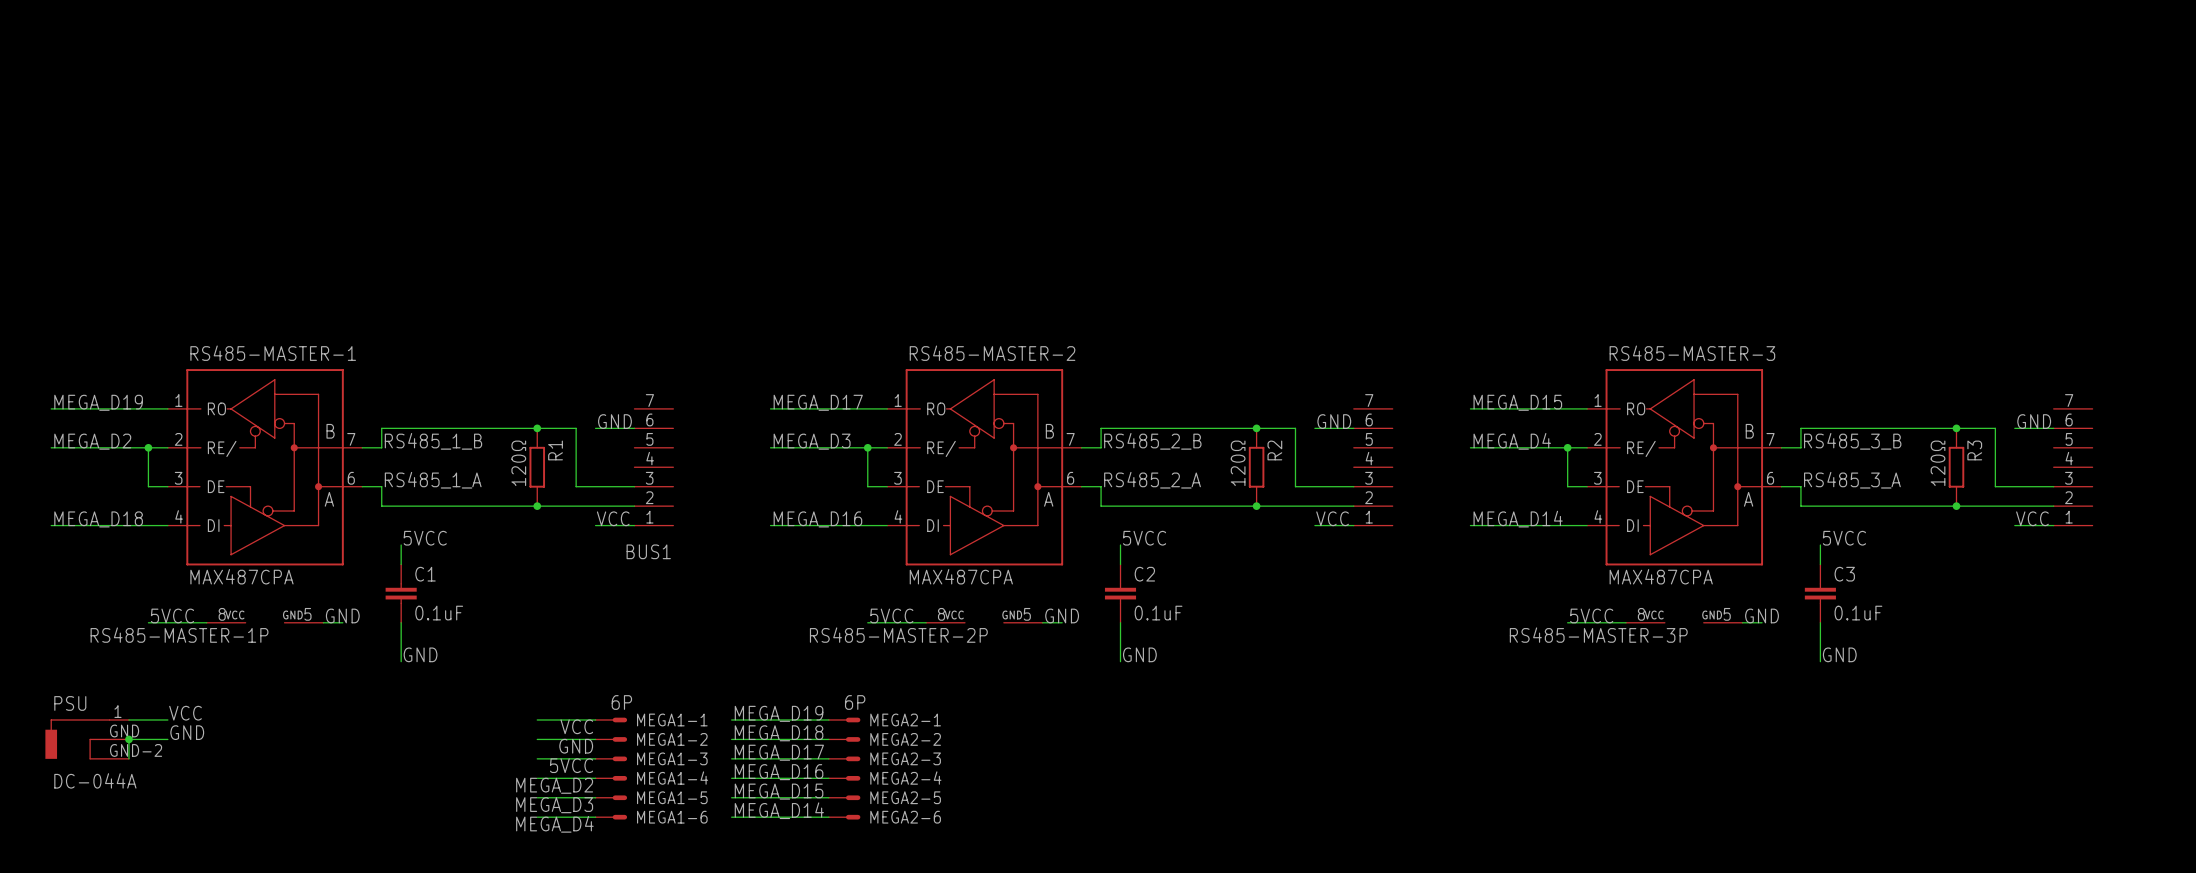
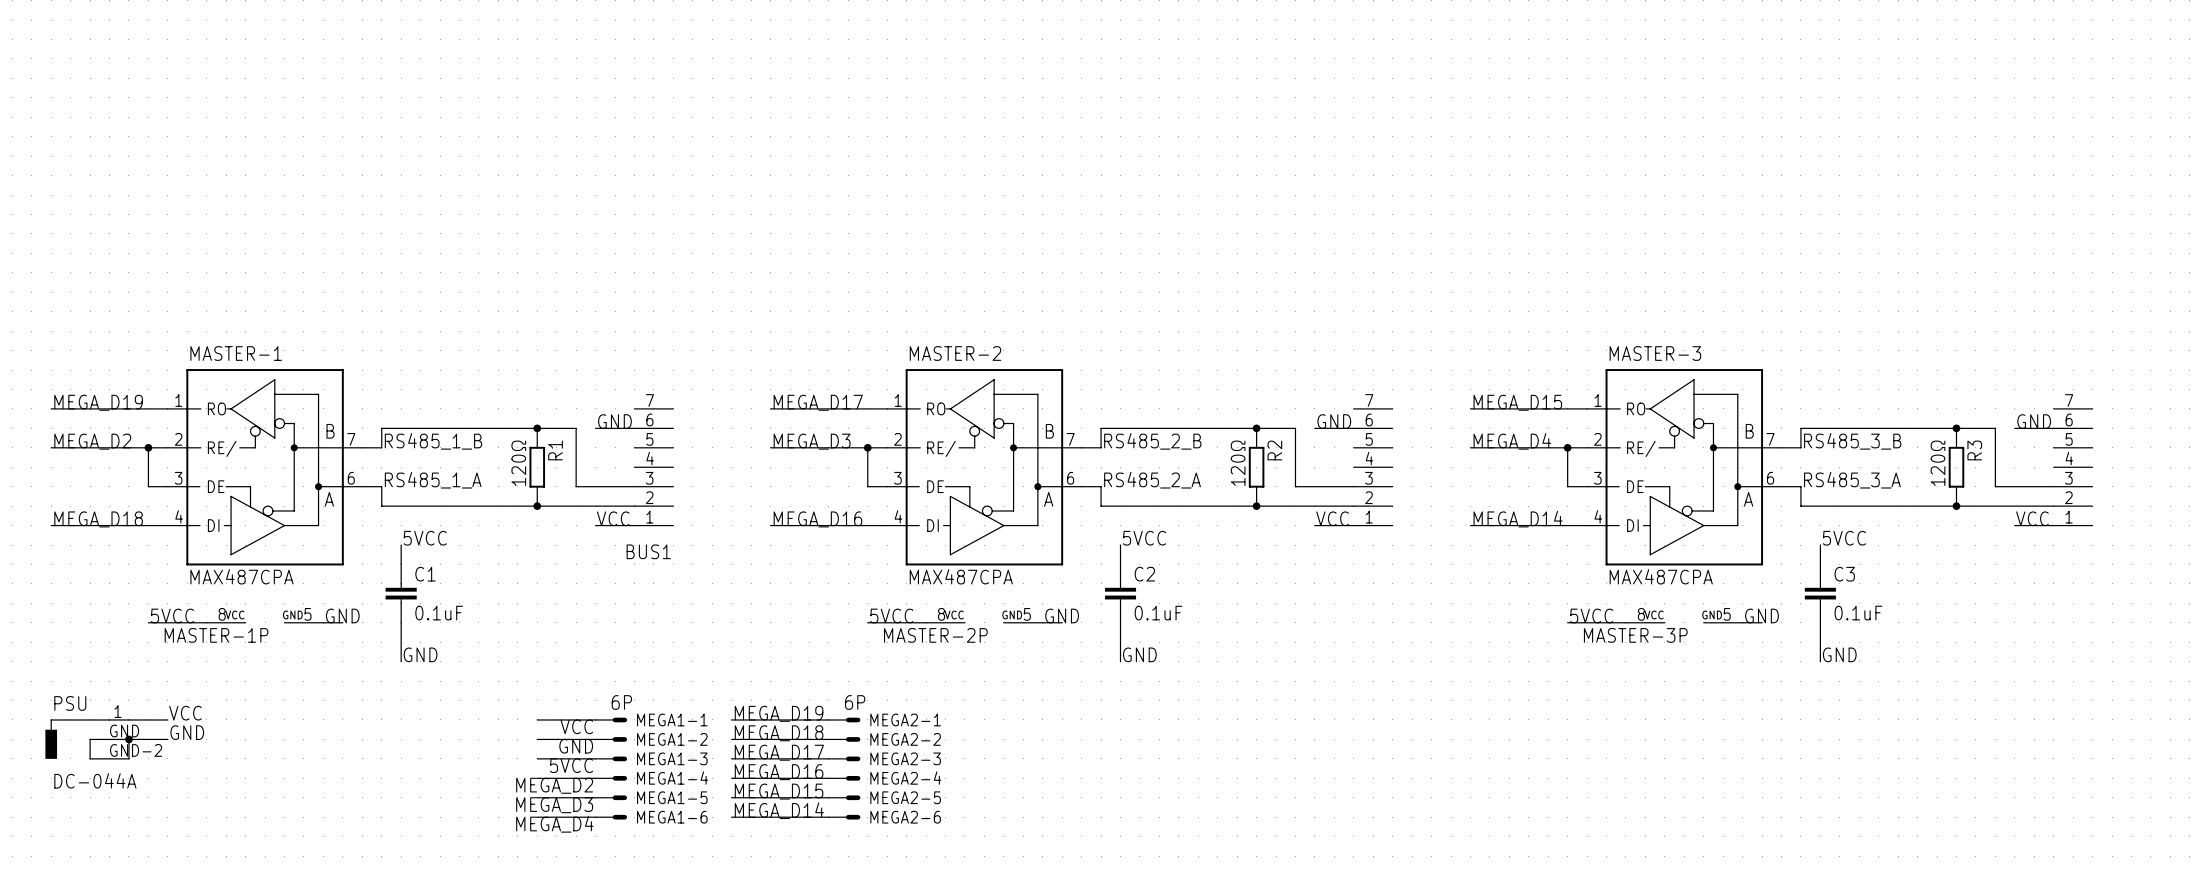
RS485-MASTER-1 name: RS485-MASTER-1 (273, 353) -> MASTER-1 (236, 353)
RS485-MASTER-2 name: RS485-MASTER-2 (992, 353) -> MASTER-2 (955, 353)
RS485-MASTER-3 name: RS485-MASTER-3 (1692, 353) -> MASTER-3 (1655, 353)
RS485-MASTER-1P name: RS485-MASTER-1P (179, 635) -> MASTER-1P (216, 635)
RS485-MASTER-2P name: RS485-MASTER-2P (898, 635) -> MASTER-2P (935, 635)
RS485-MASTER-3P name: RS485-MASTER-3P (1598, 635) -> MASTER-3P (1635, 635)

